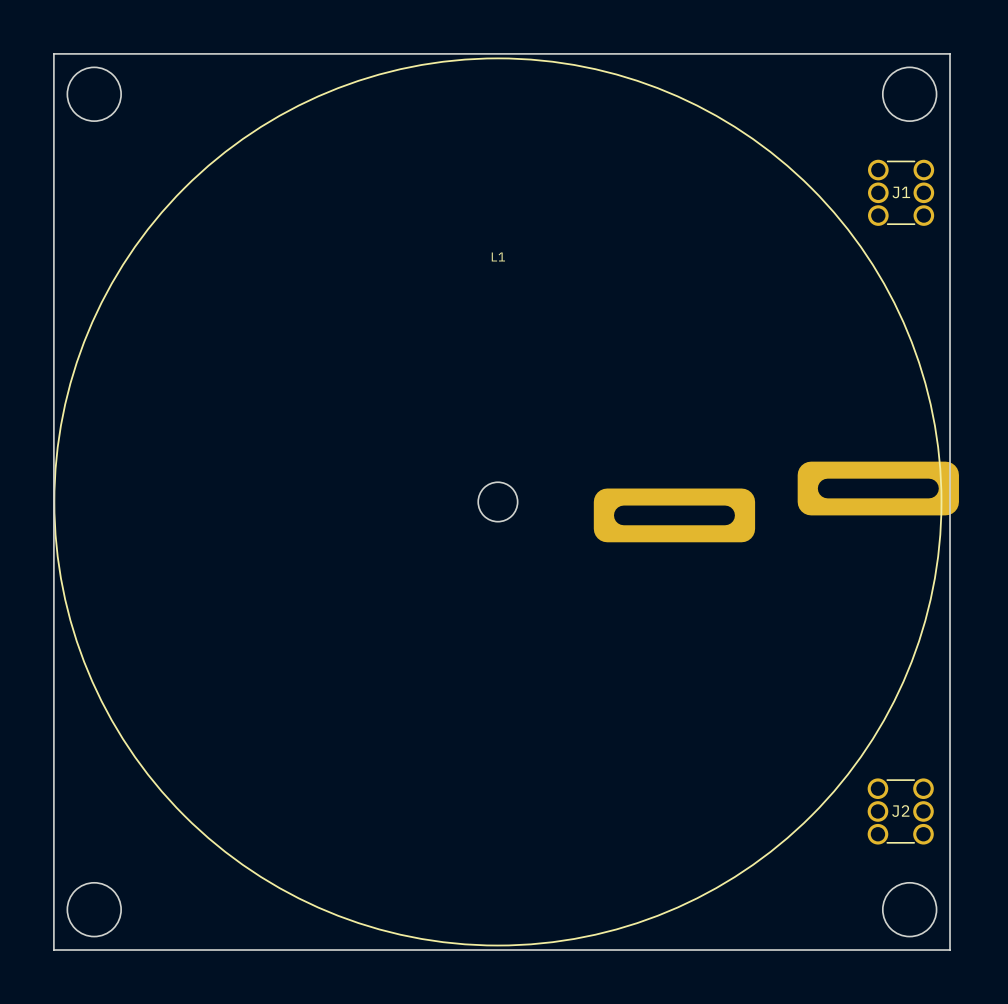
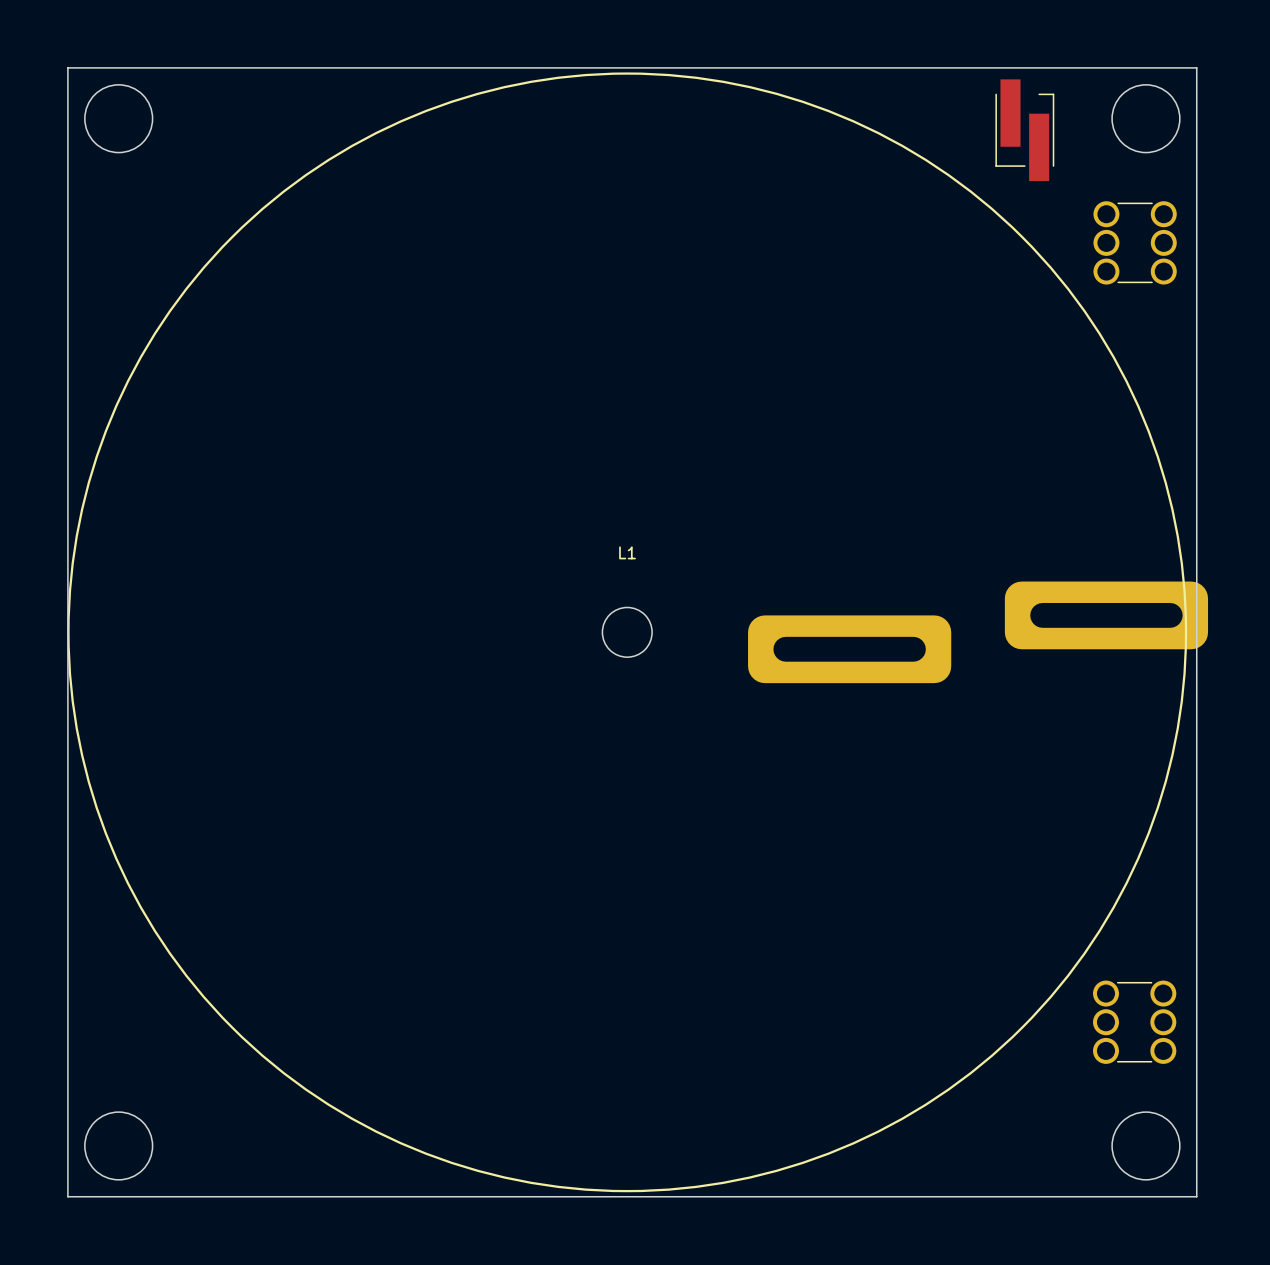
part: none -> (1024, 130)
J1 name: J1 (901, 192) -> none
L1 name position: L1 (498, 256) -> L1 (627, 552)
J2 name: J2 (900, 811) -> none

